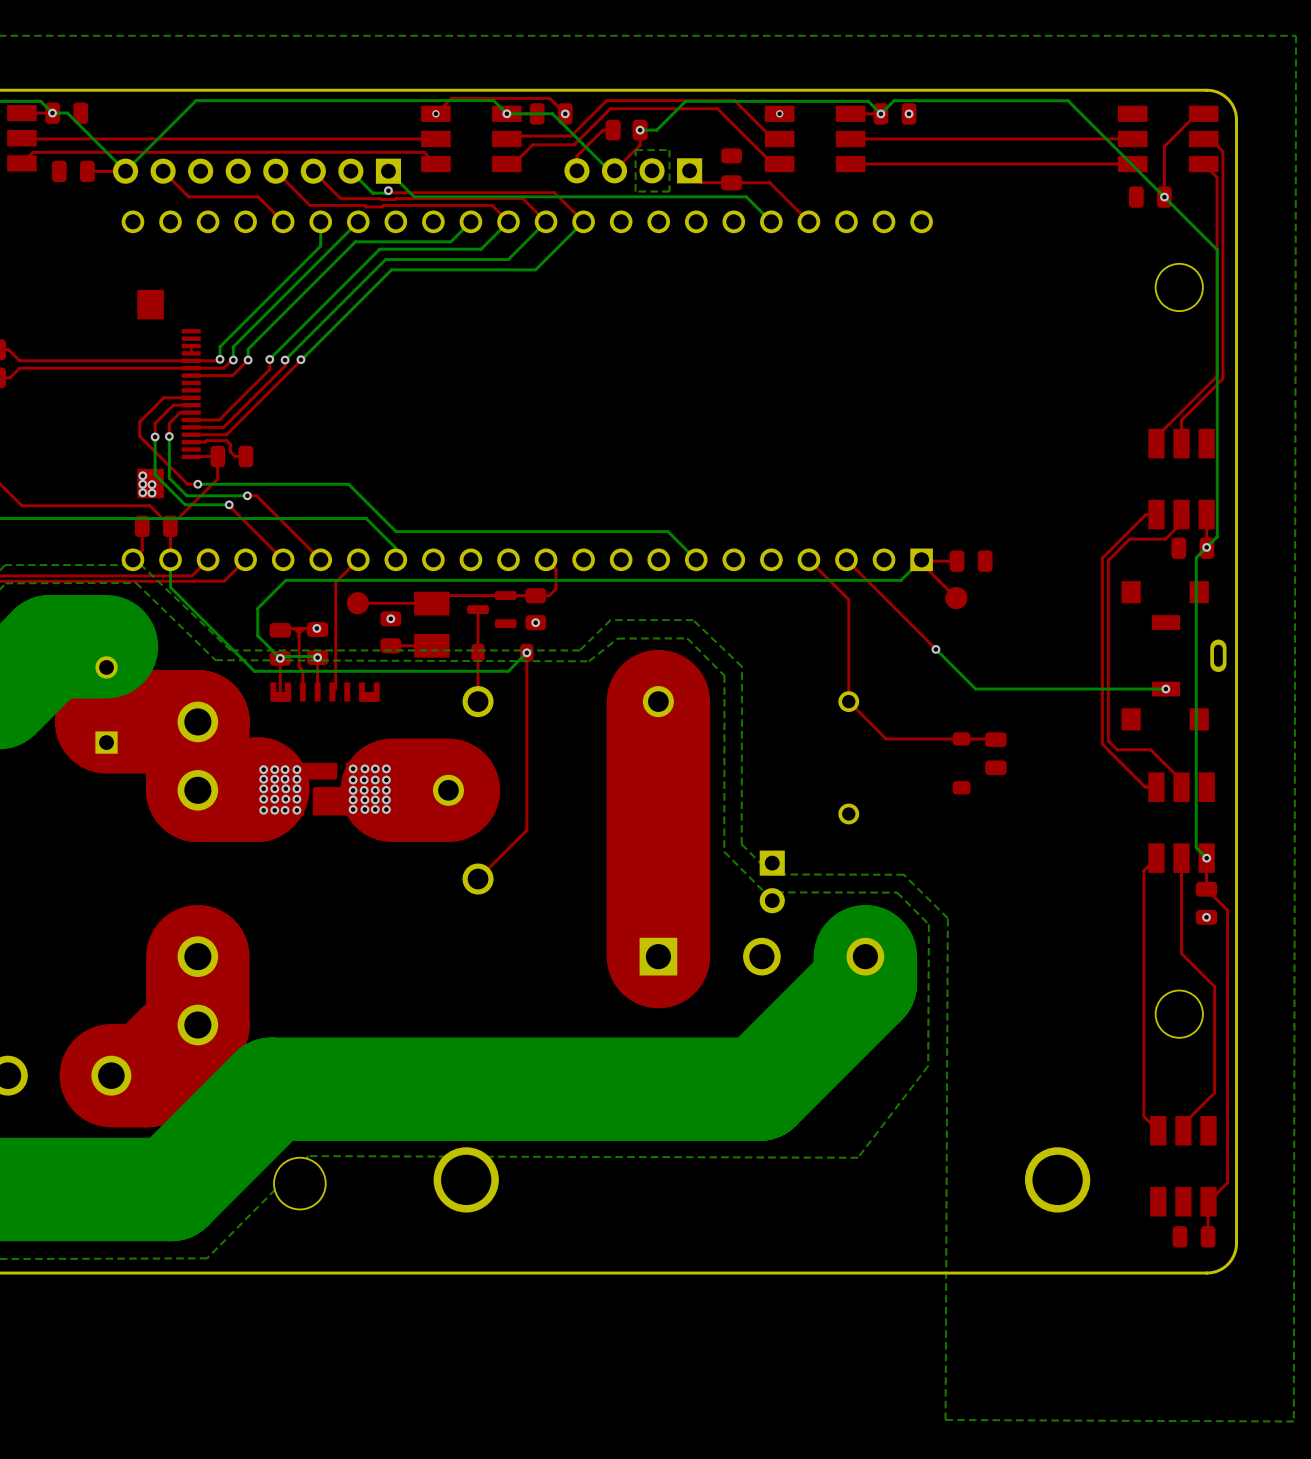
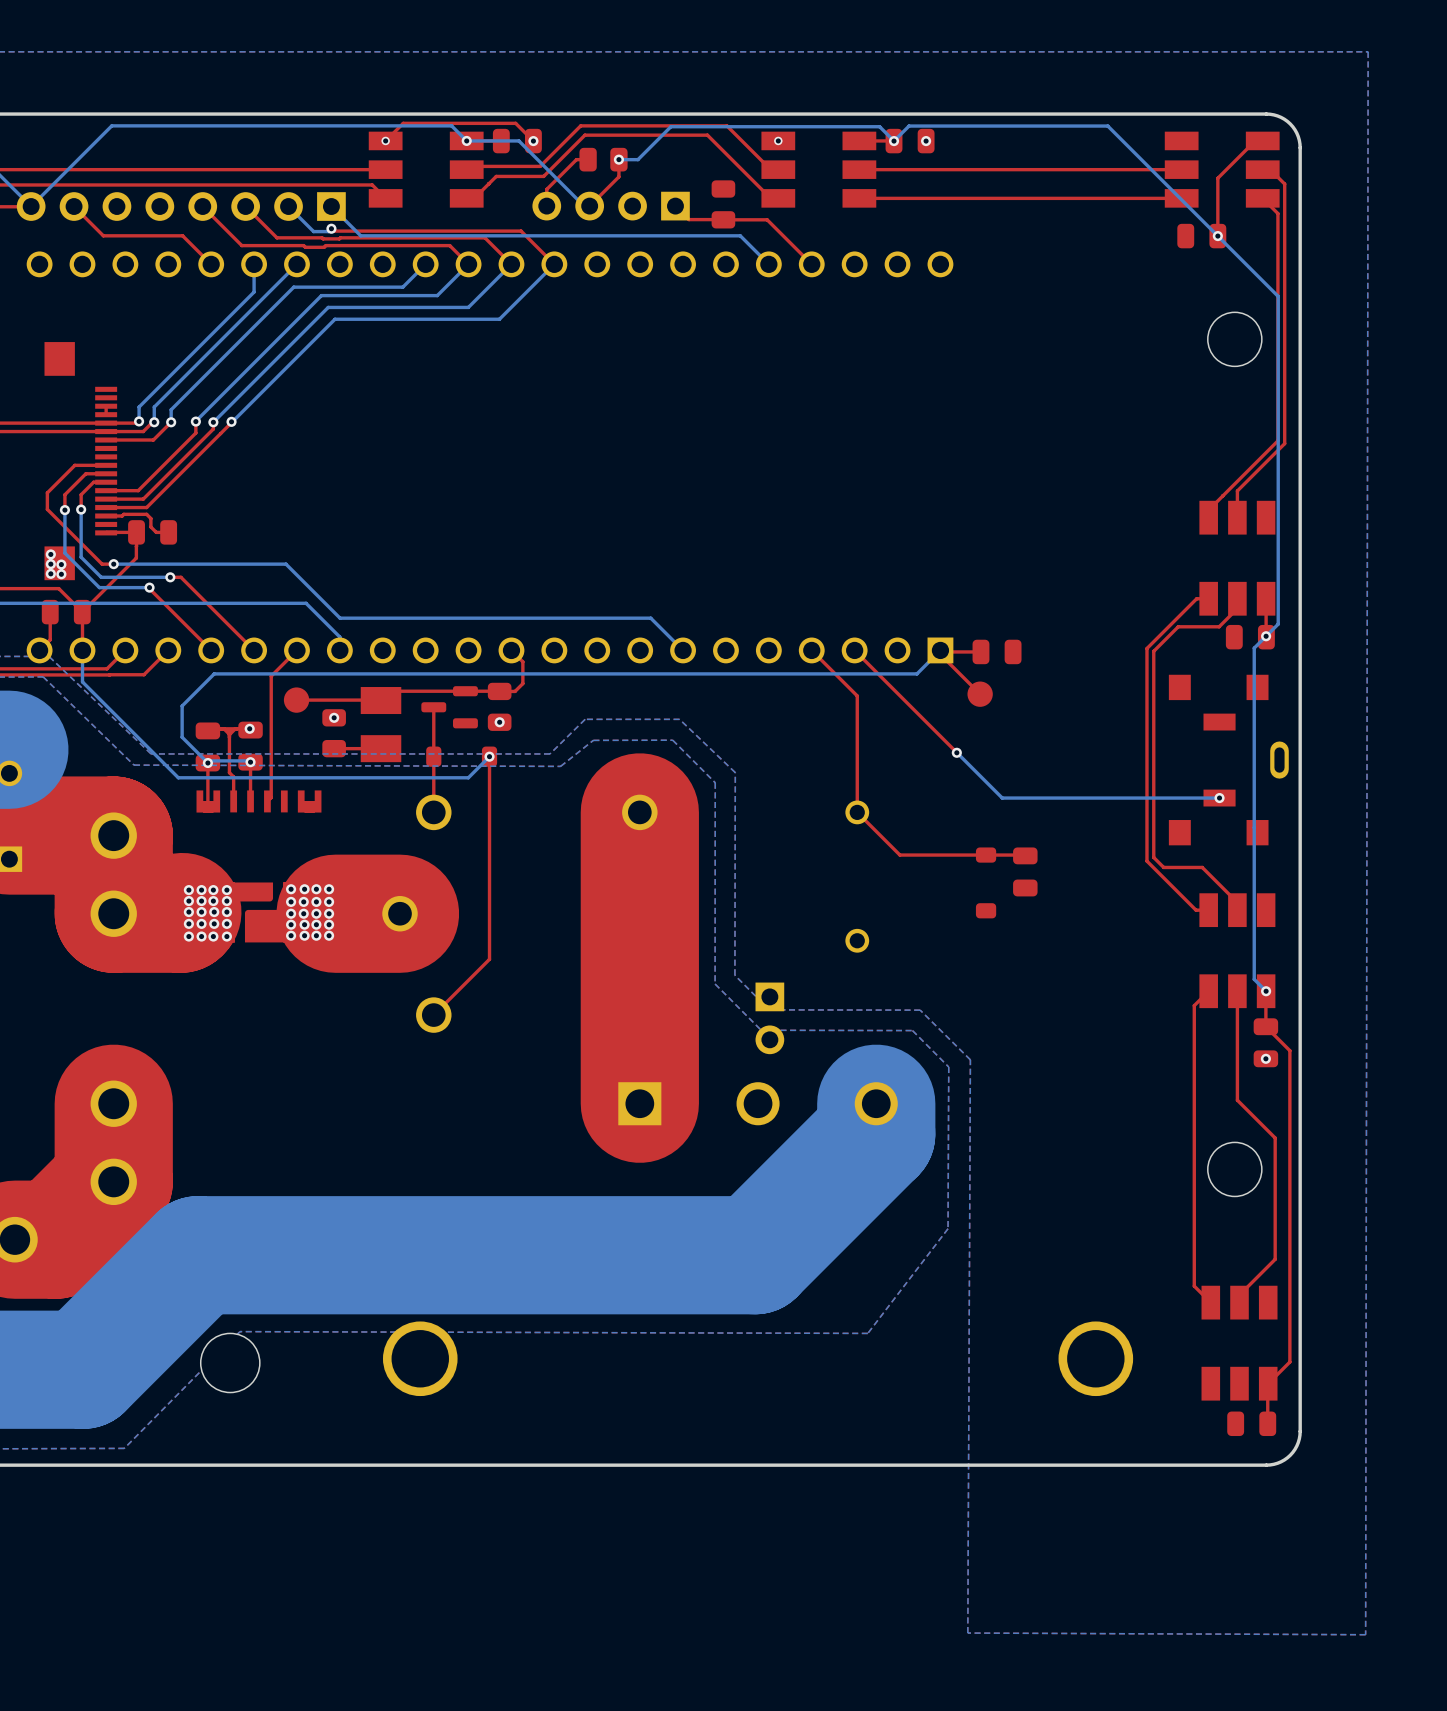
bottom zone outline: (669, 150) (669, 191) (635, 191) (635, 150) (669, 150) -> none

